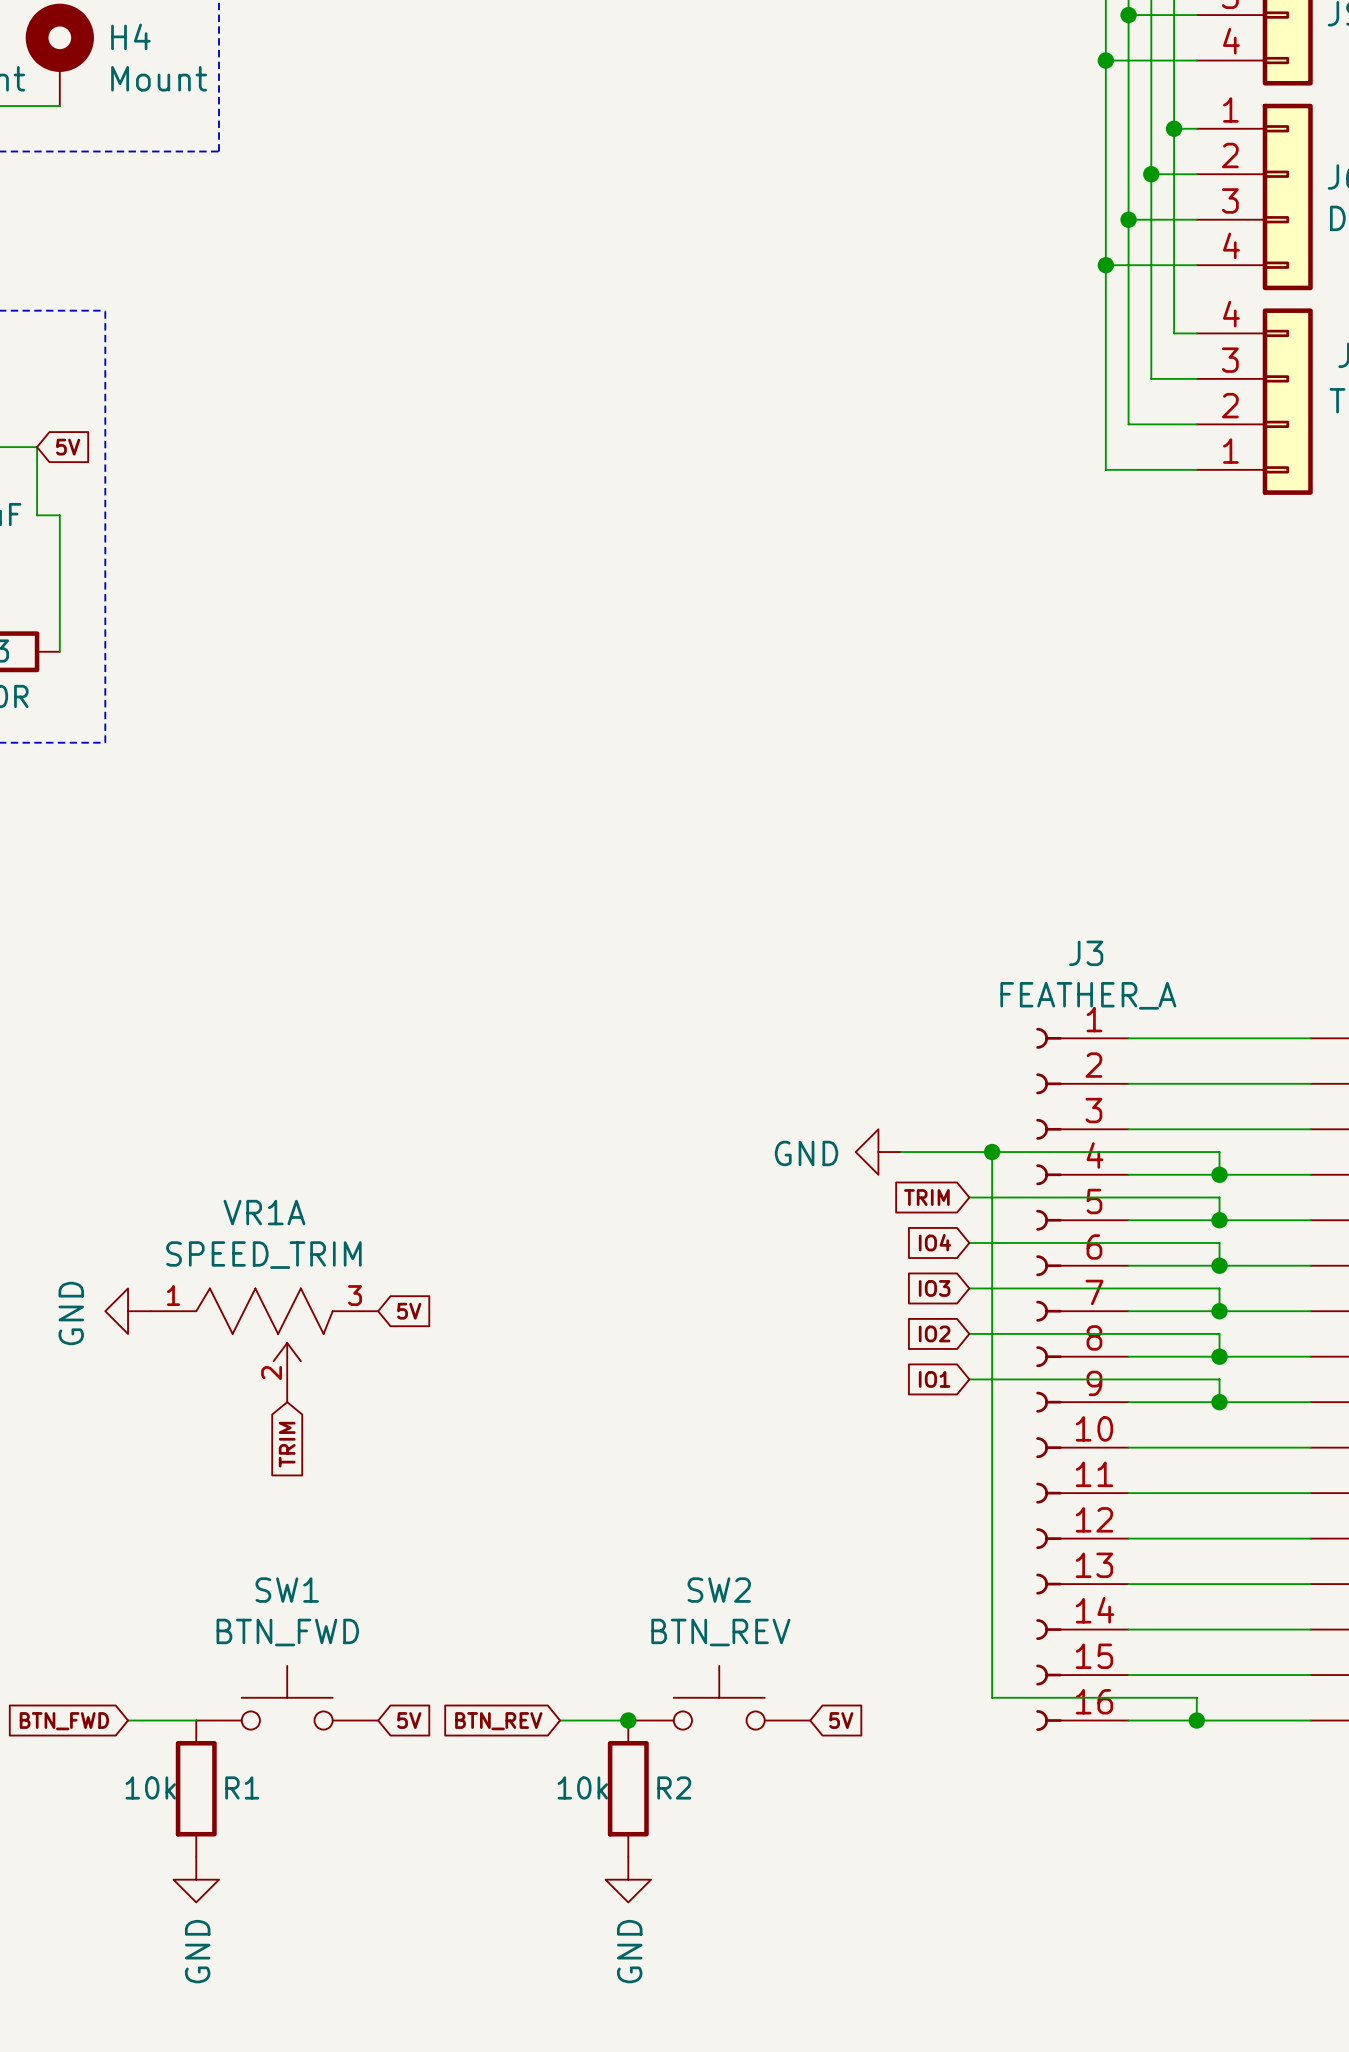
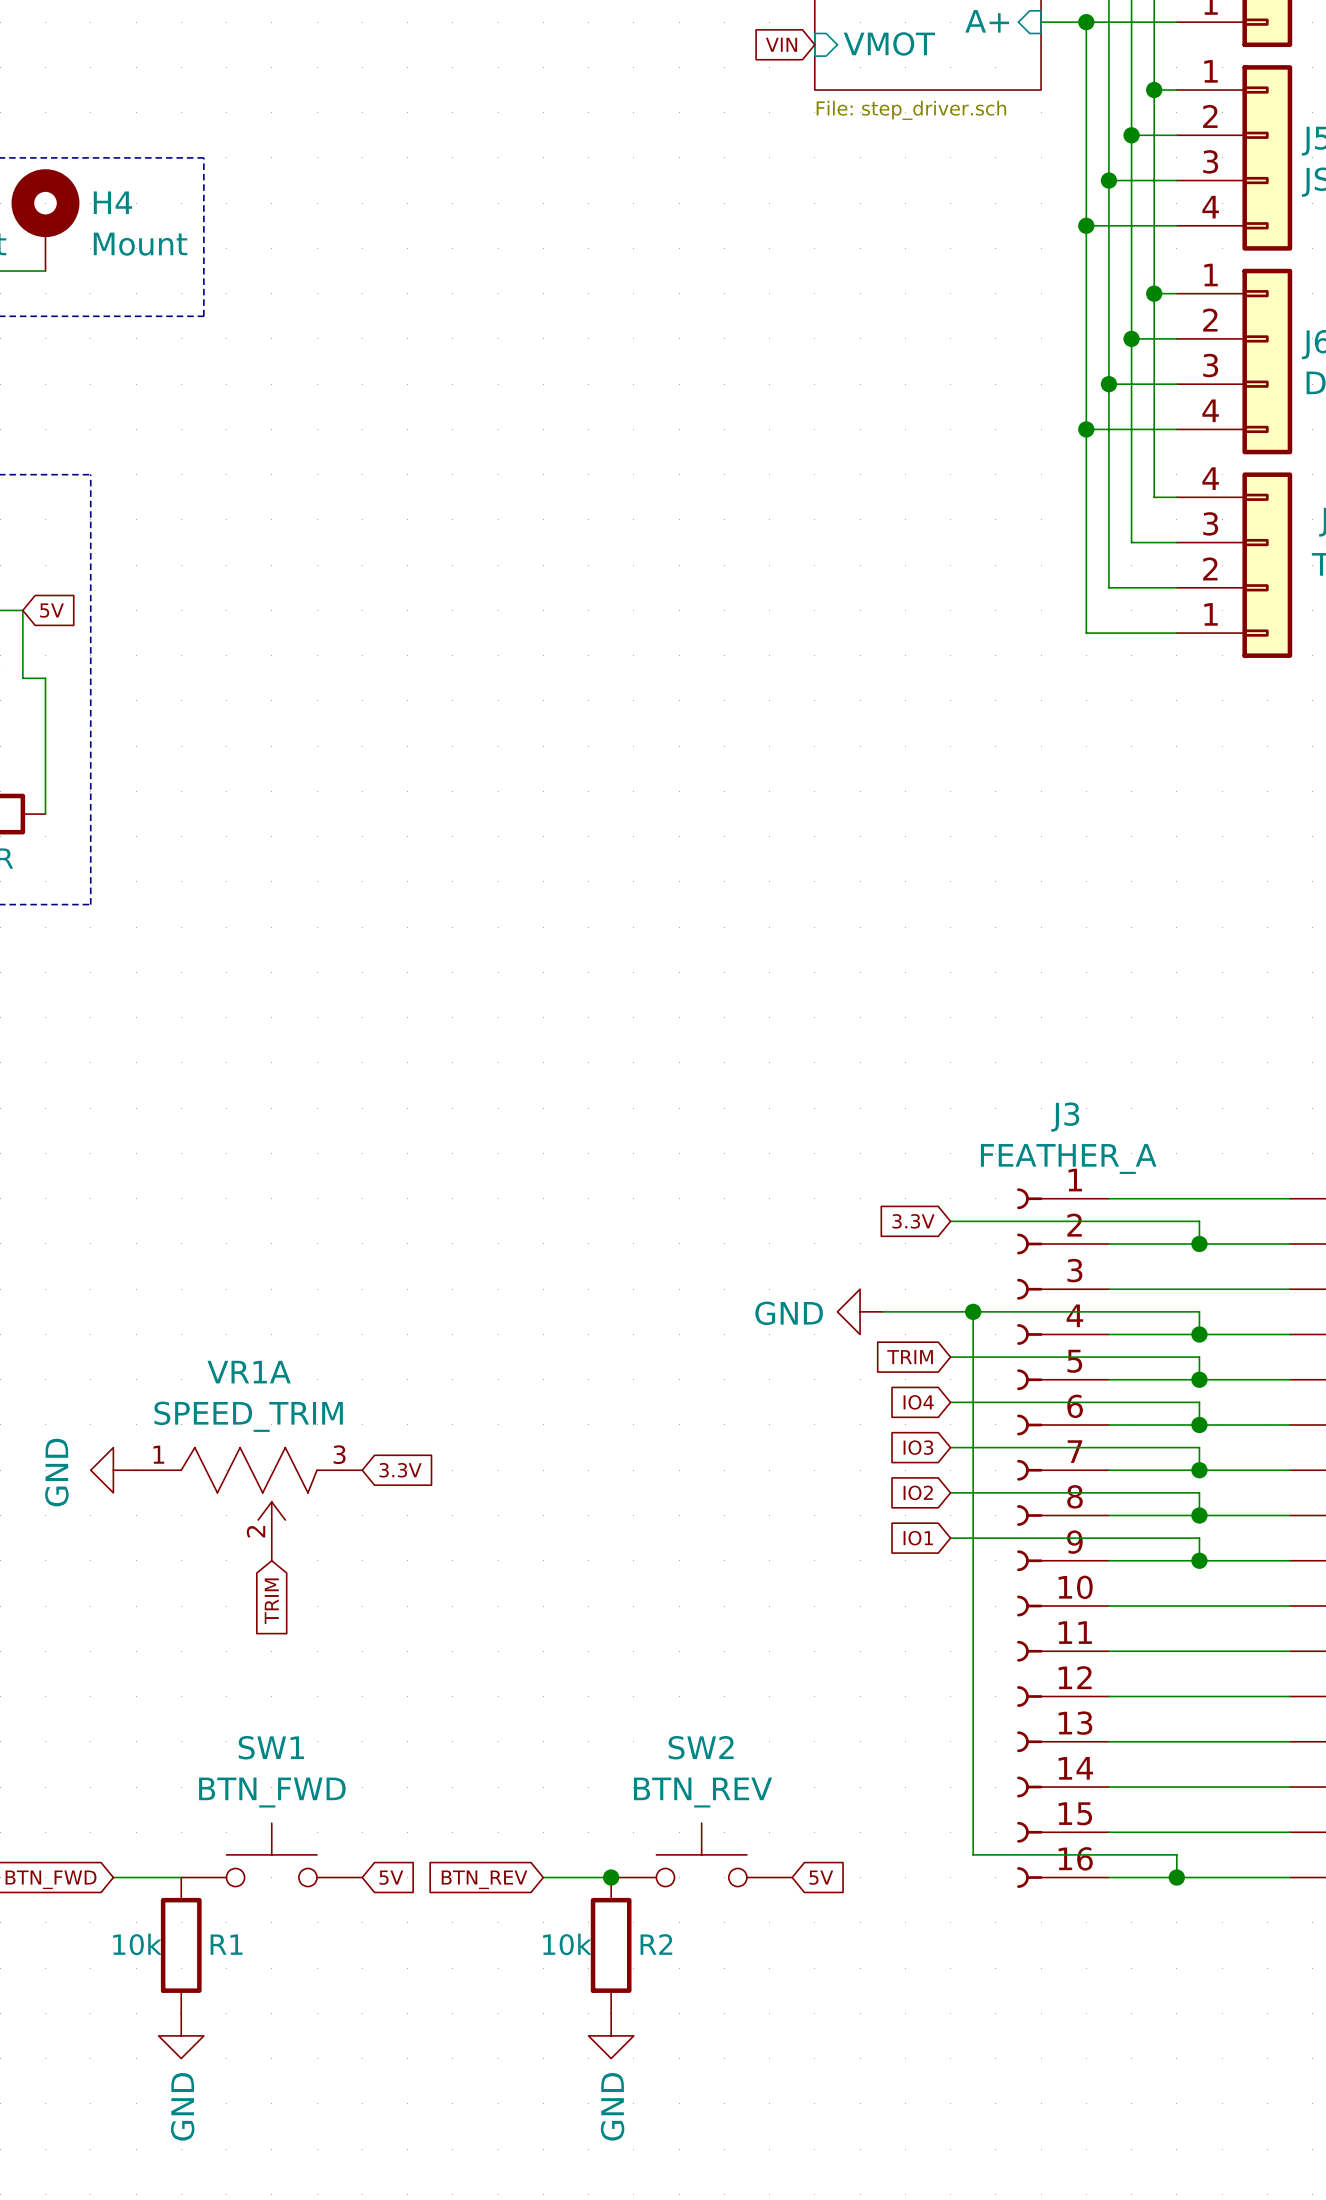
global label: none -> 3.3V (913, 1221)
wire: none -> (950, 1221) (1199, 1221) (1199, 1243)
junction: none -> (1199, 1243)
global label: 5V (409, 1311) -> 3.3V (400, 1470)

